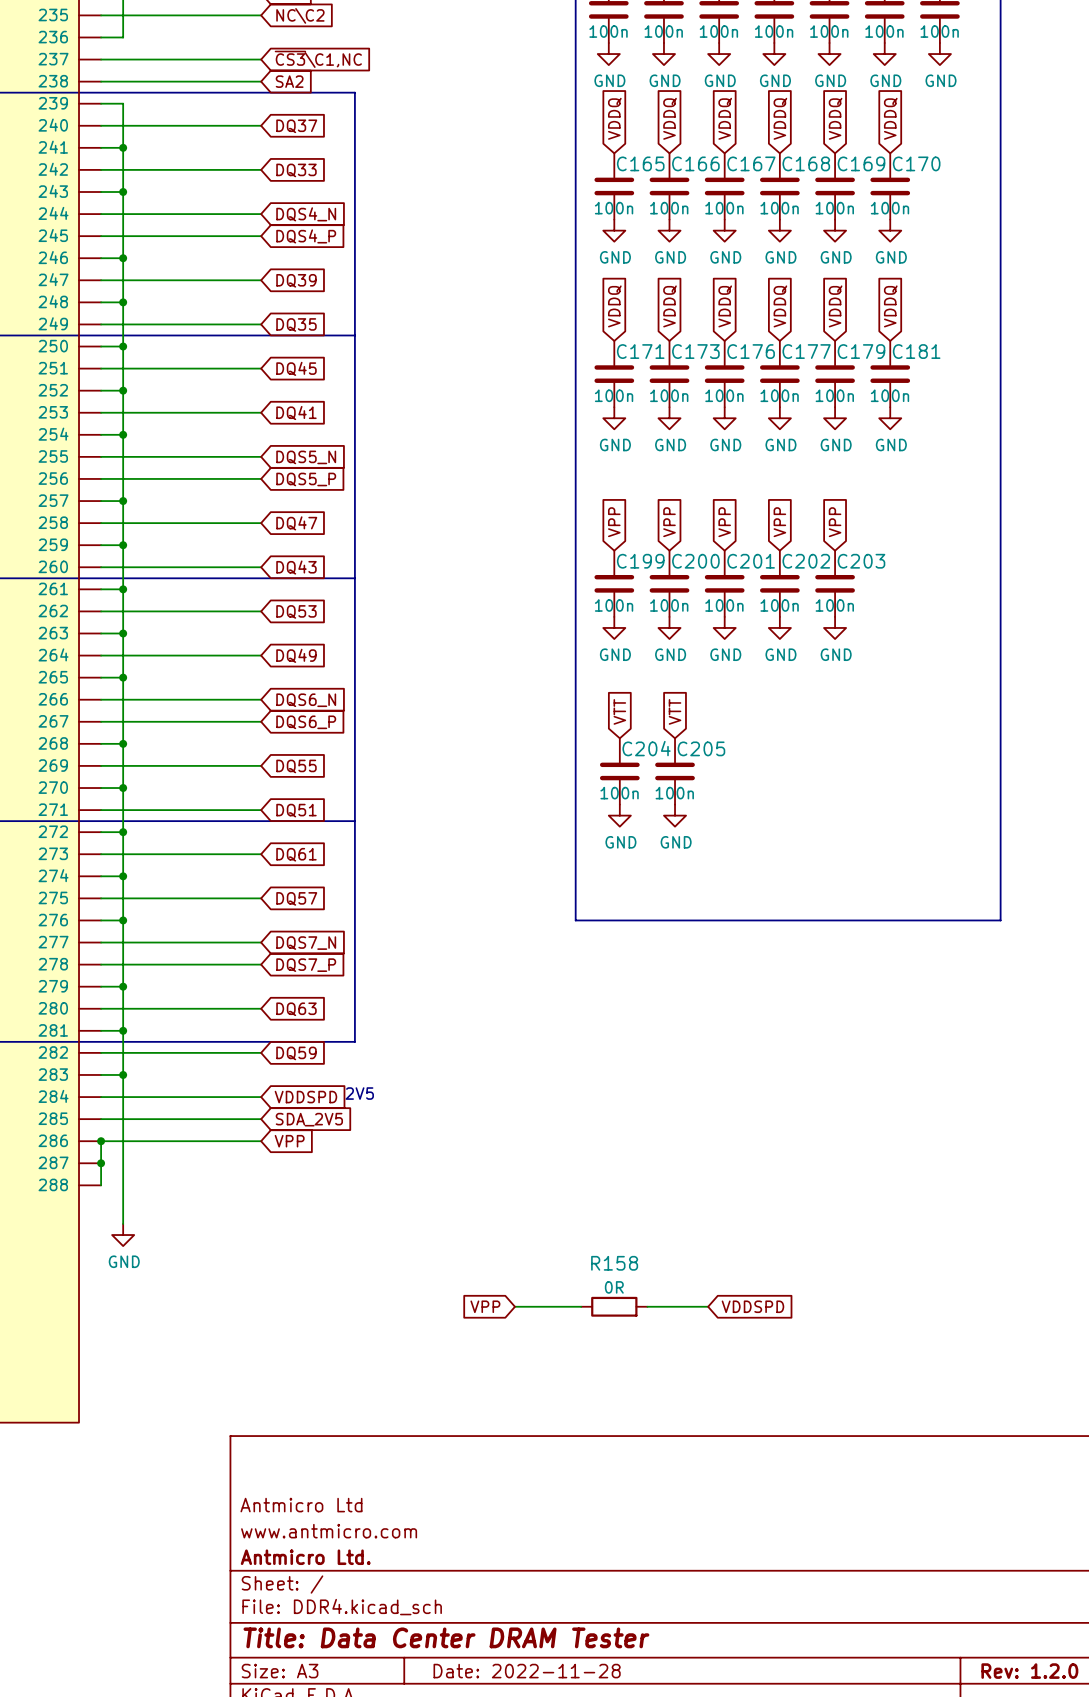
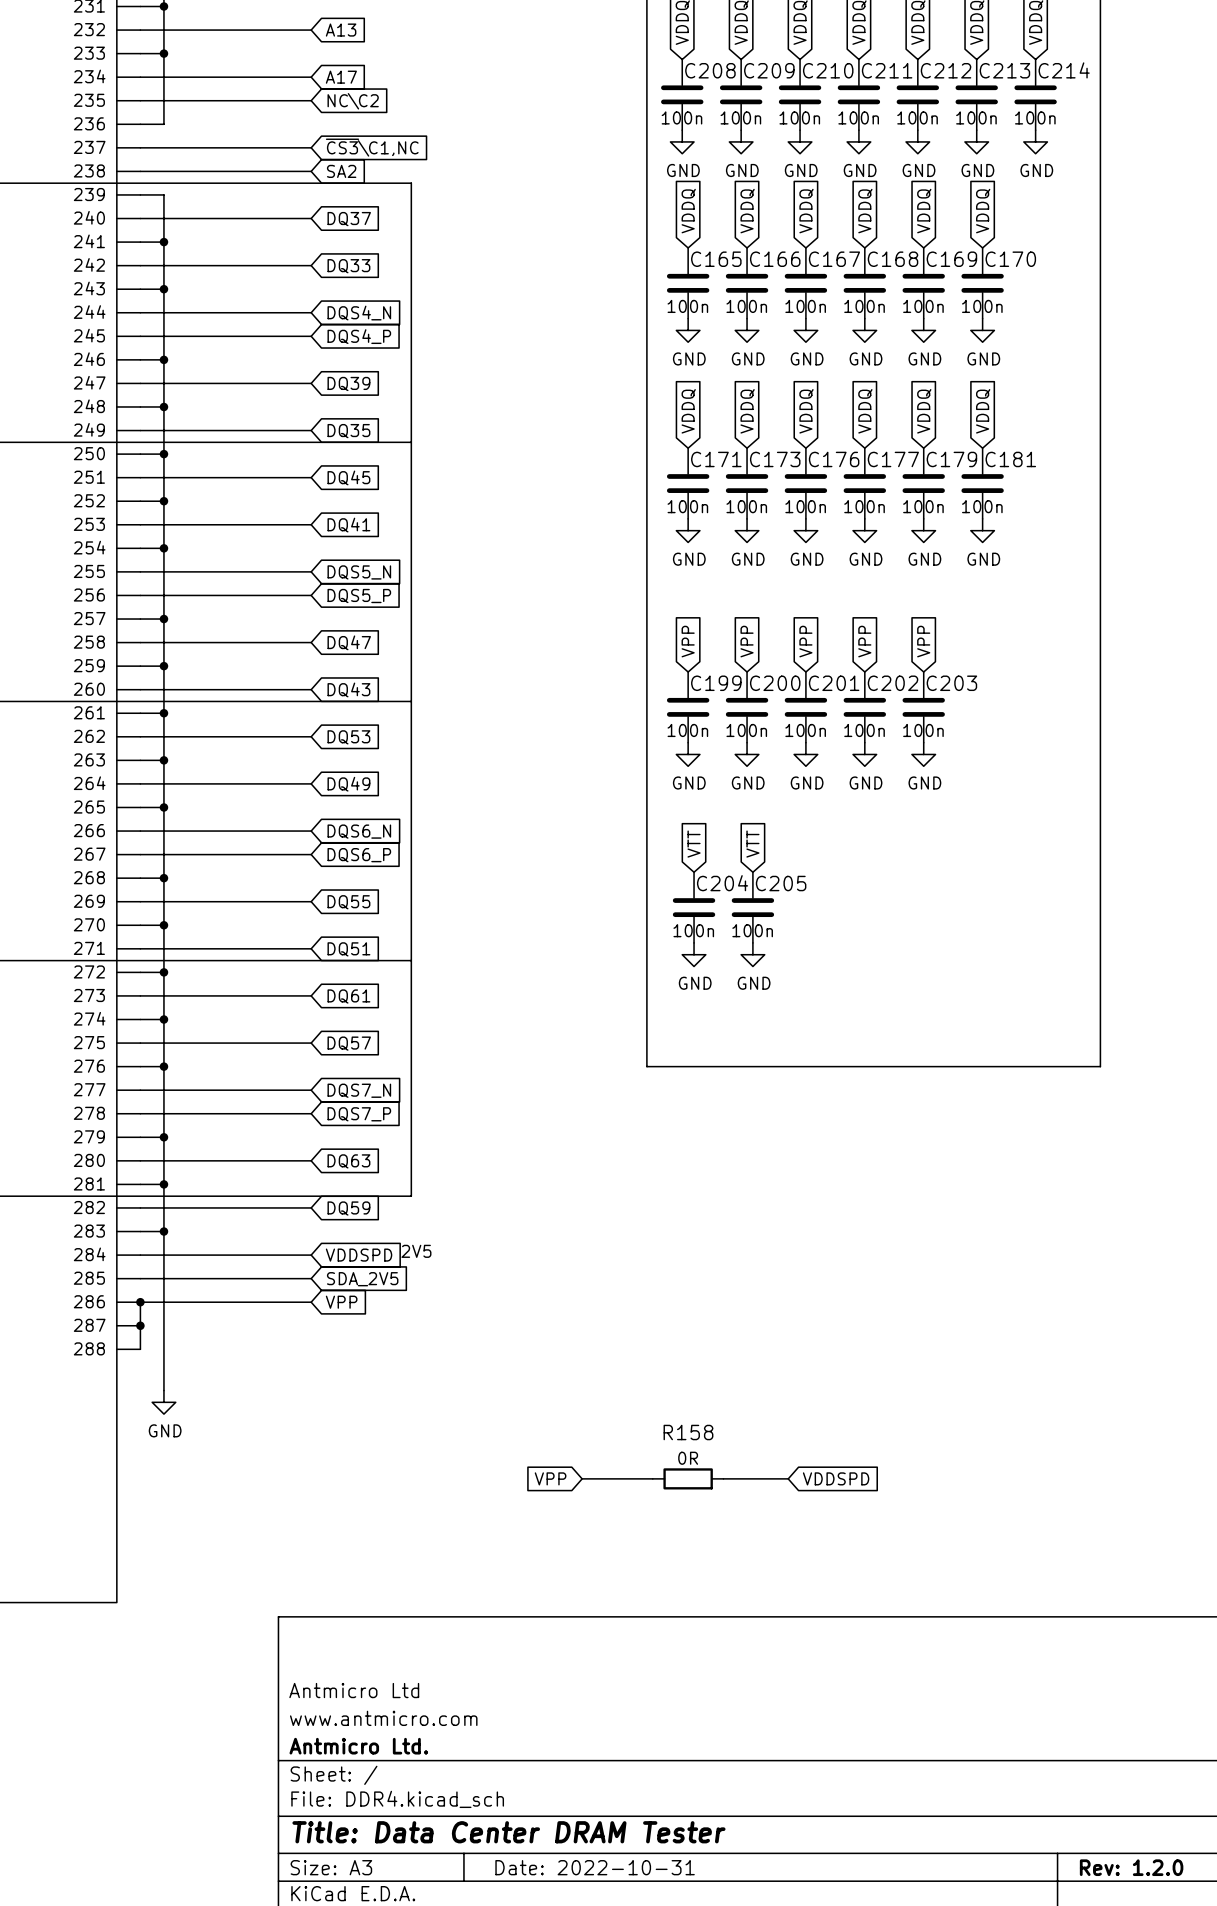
title block: Date: 2022-11-28 (527, 1671) -> Date: 2022-10-31 (595, 1867)

